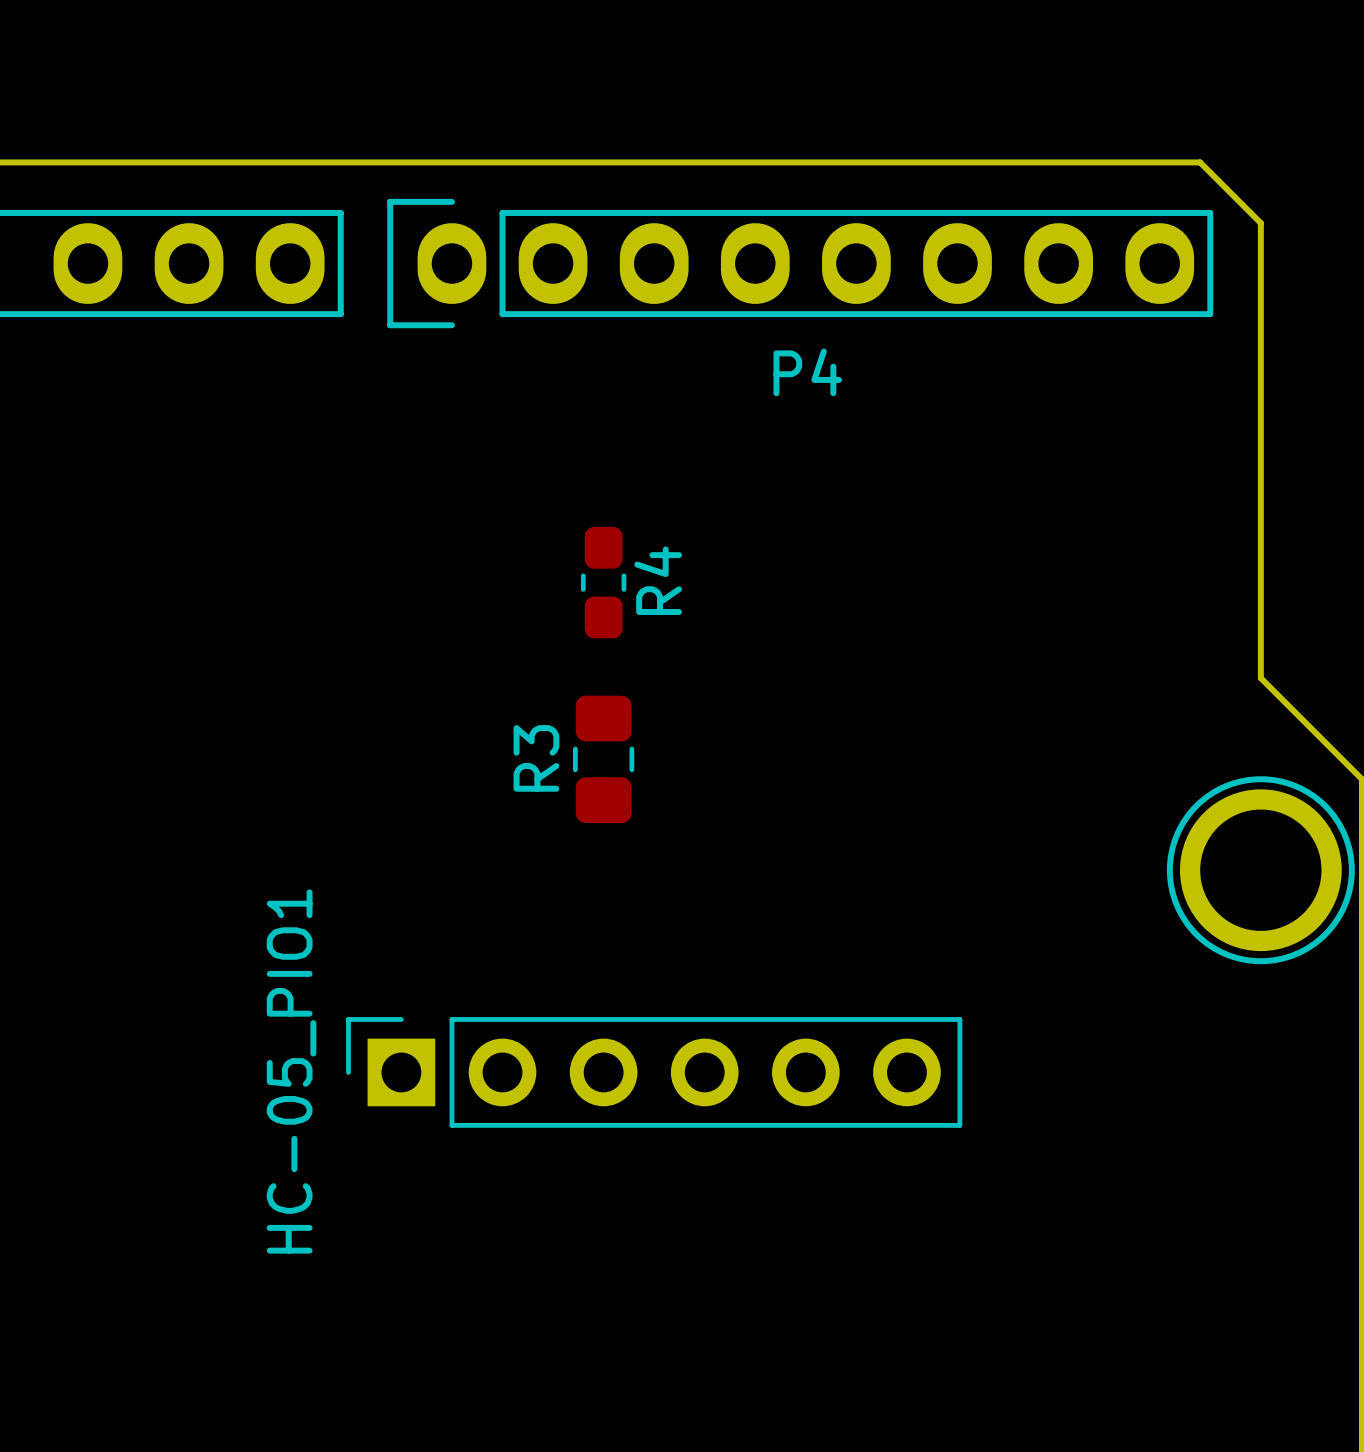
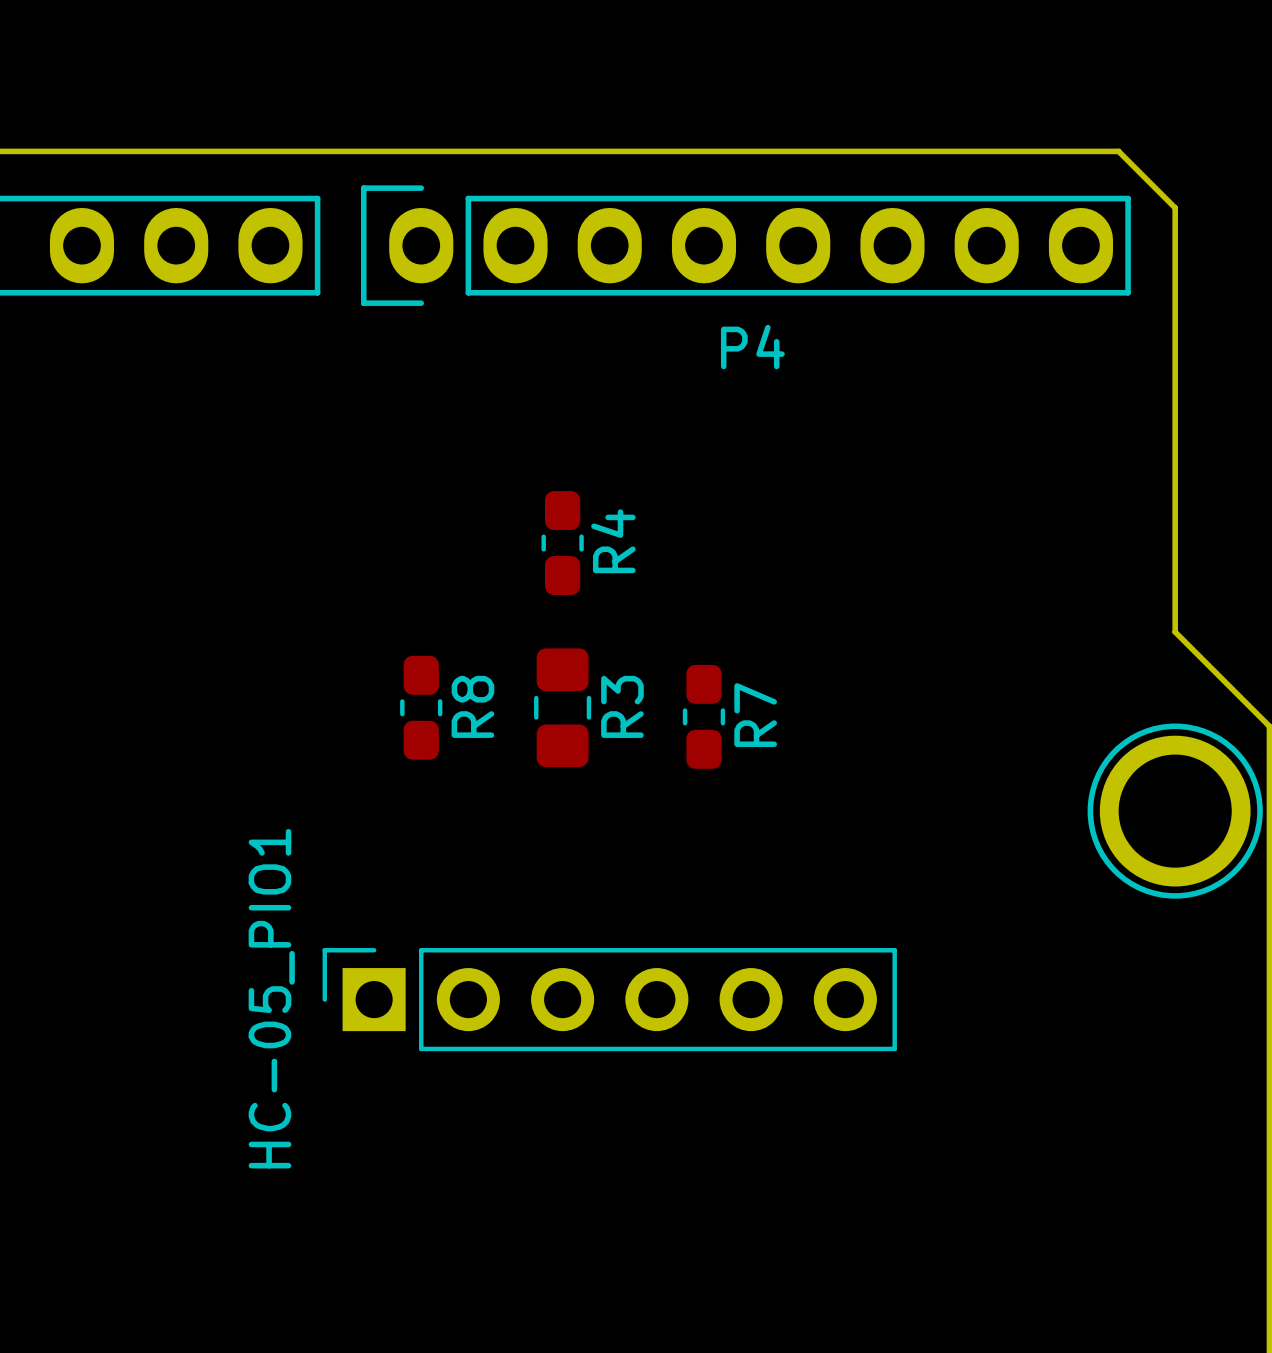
R3 name position: R3 (536, 758) -> R3 (622, 706)
R8: none -> (421, 707)
R7: none -> (703, 716)

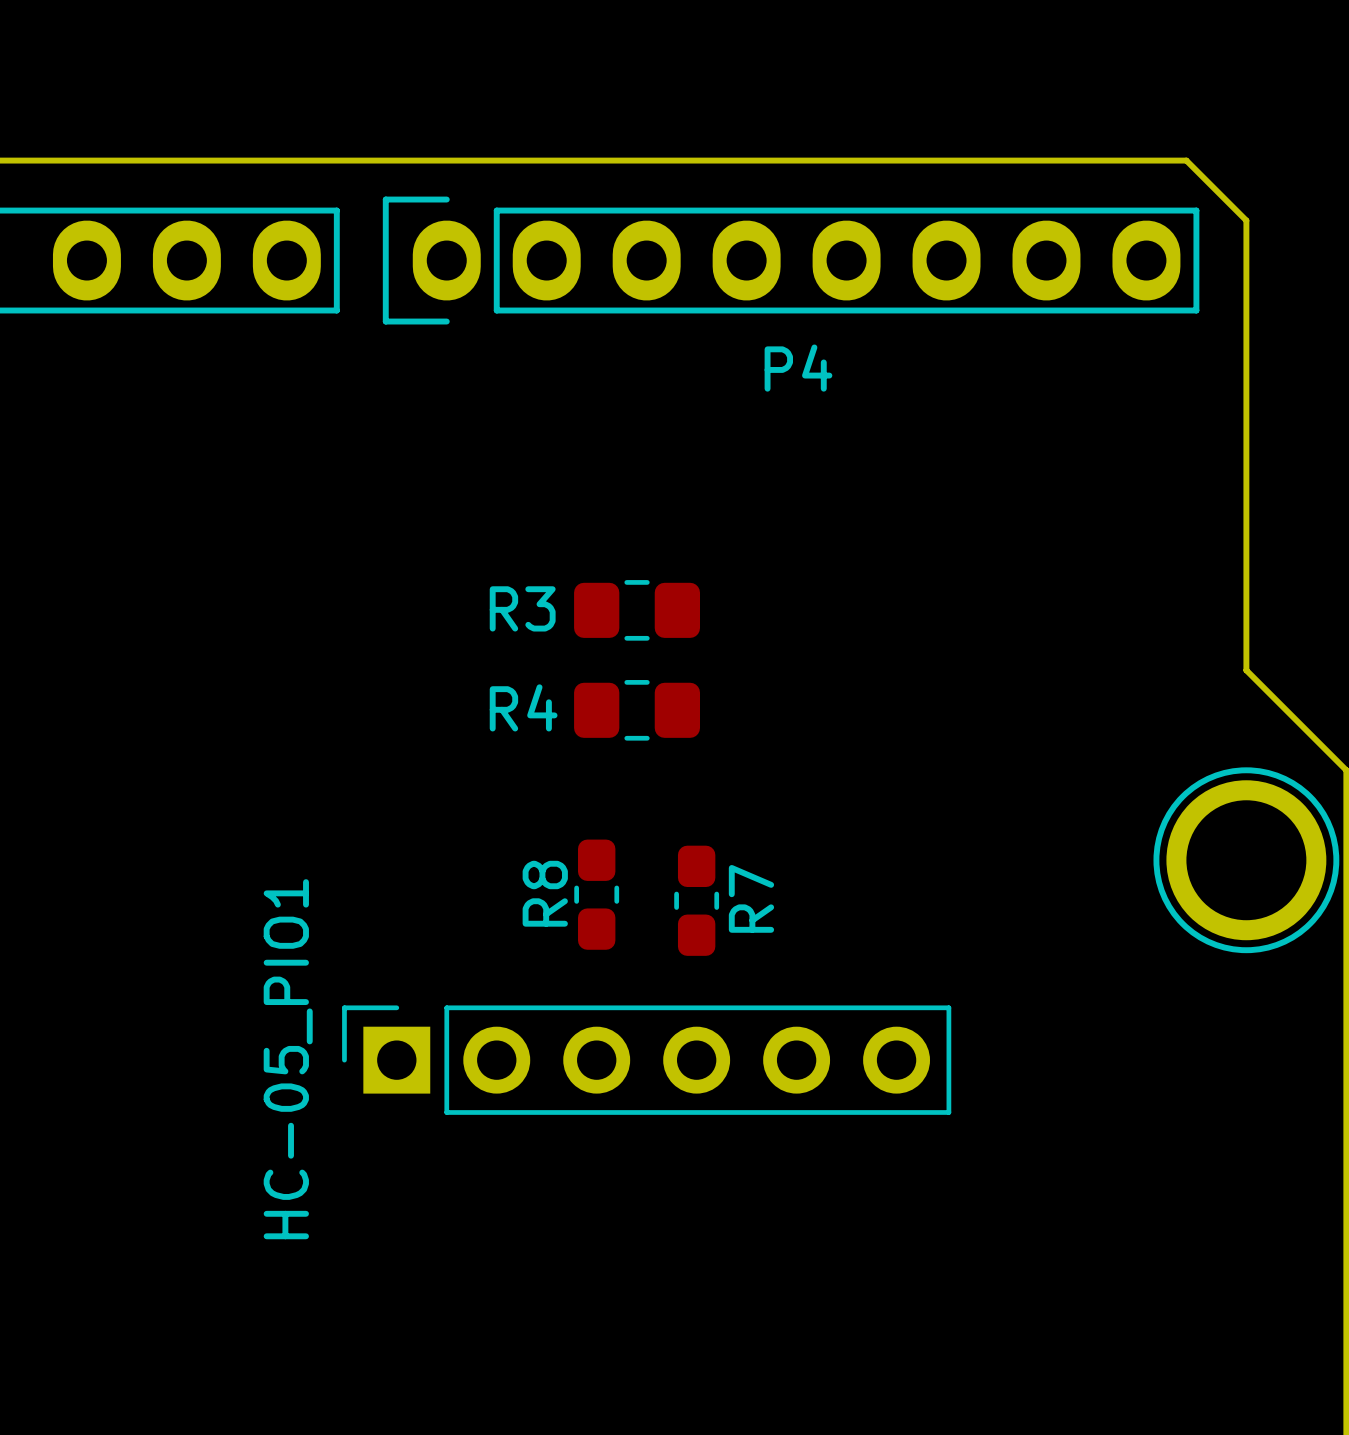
R4 footprint: [541, 491, 584, 595] -> [574, 580, 701, 641]
R4 name position: R4 (613, 541) -> R4 (523, 707)
R8 name position: R8 (472, 706) -> R8 (545, 893)
R3 name position: R3 (622, 706) -> R3 (522, 608)
R8 position: (421, 707) -> (596, 894)
R3 rotation: 0° (562, 707) -> 90° clockwise (637, 710)
R7 position: (703, 716) -> (696, 900)

